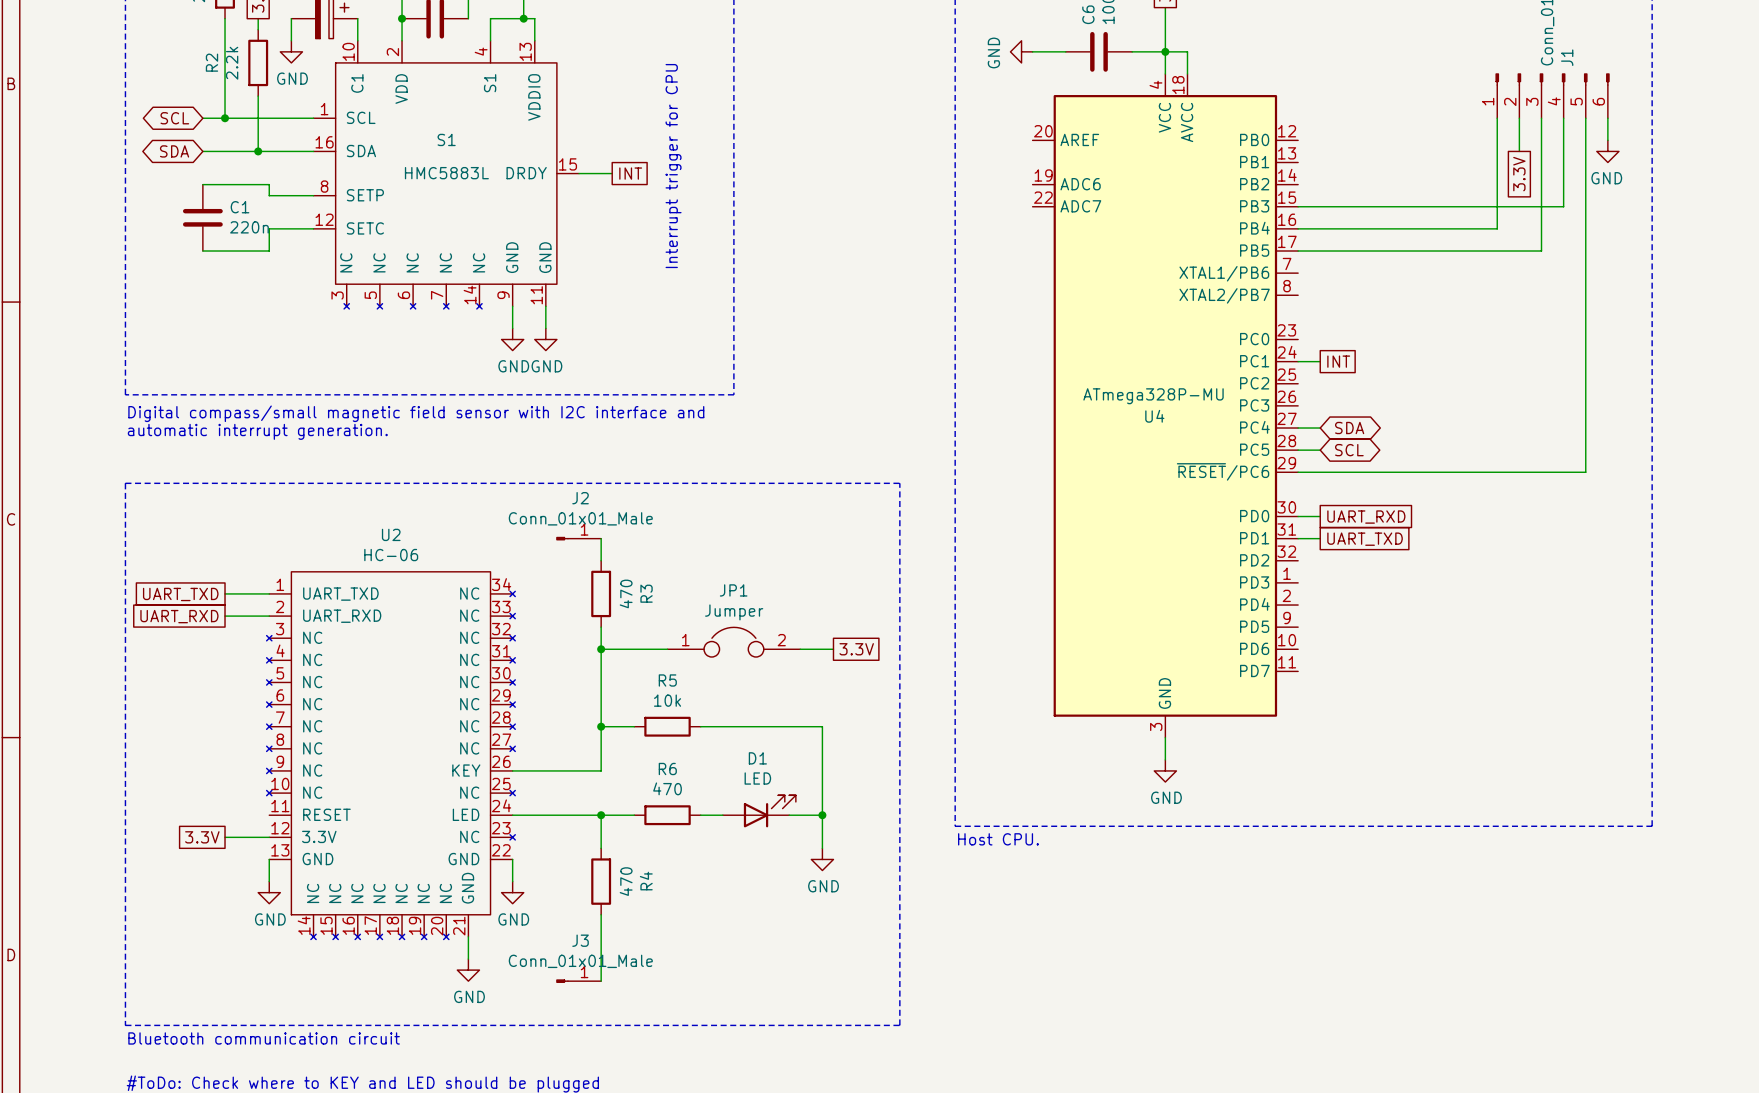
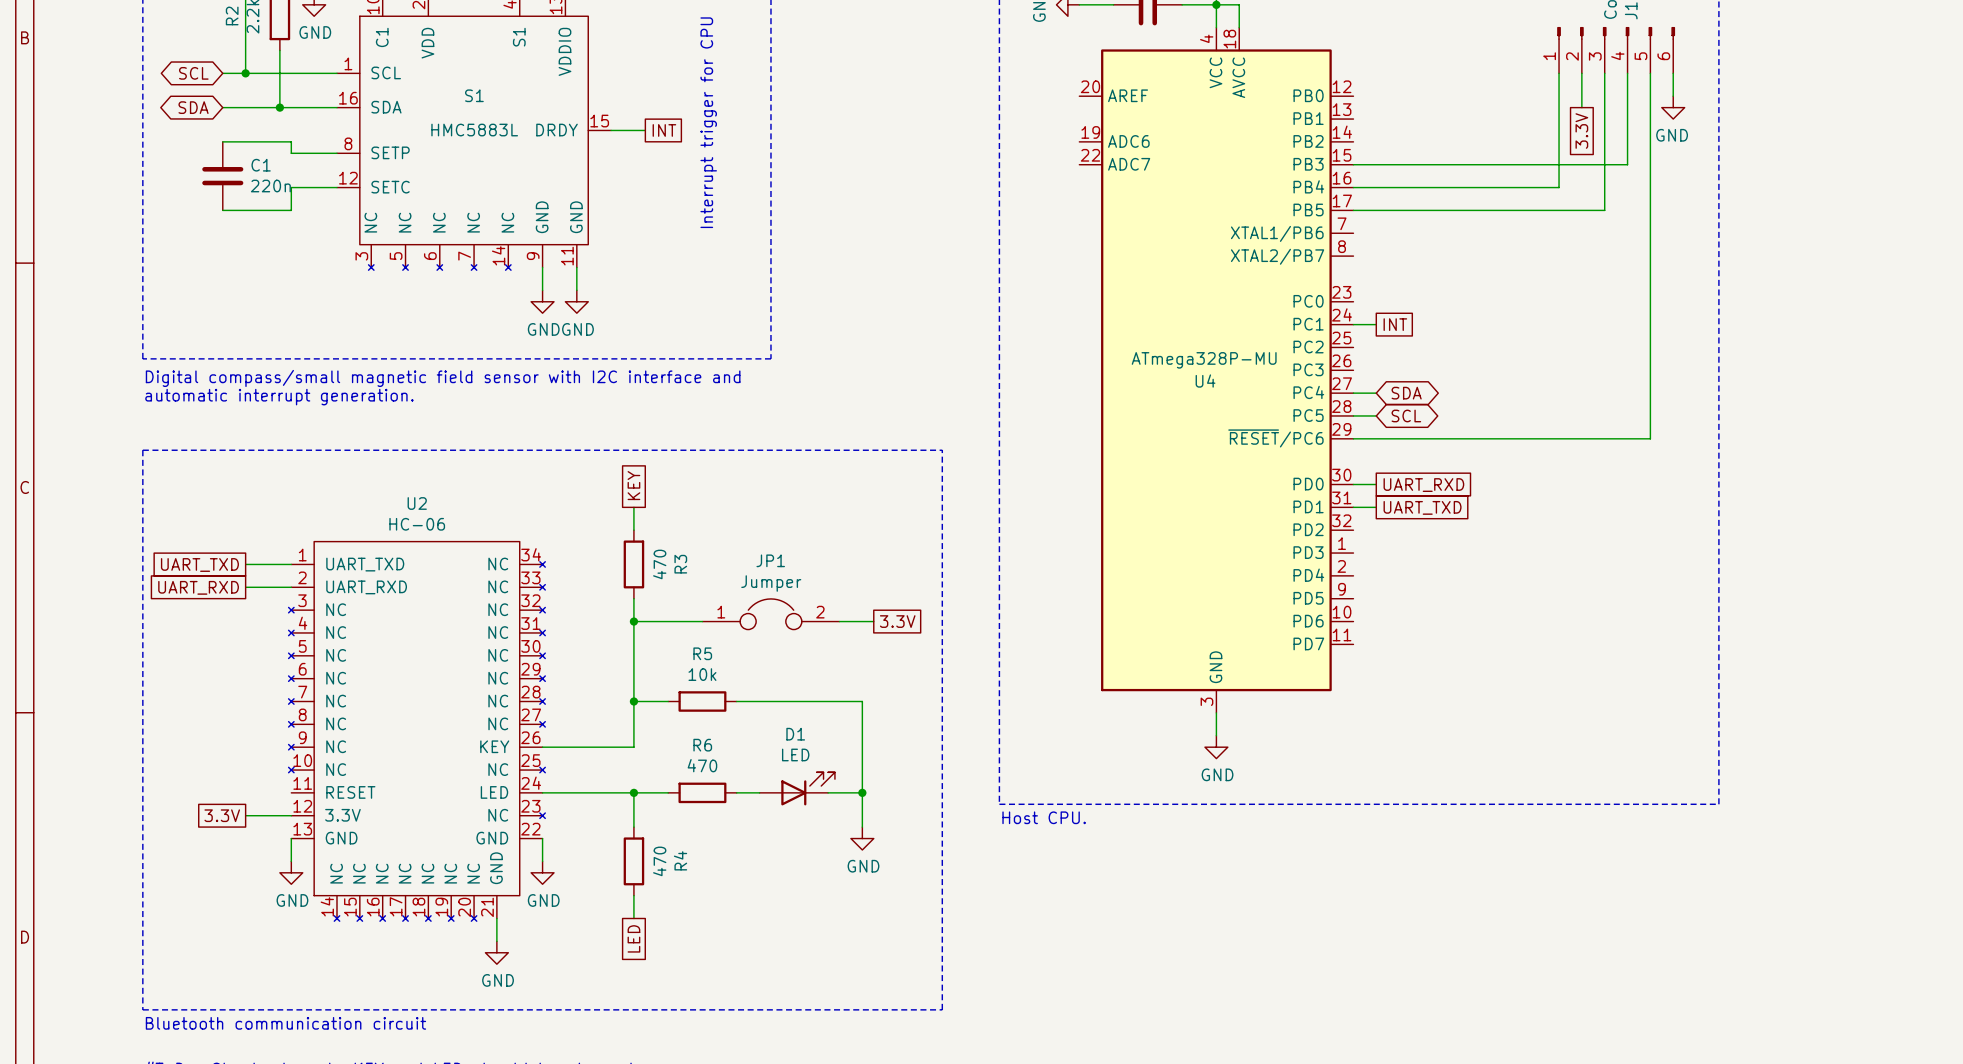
global label: none -> KEY (633, 485)
J2: Conn_01x01_Male (578, 538) -> none
wire: (601, 936) (601, 981) -> none
global label: none -> LED (633, 938)
J3: Conn_01x01_Male (578, 981) -> none

